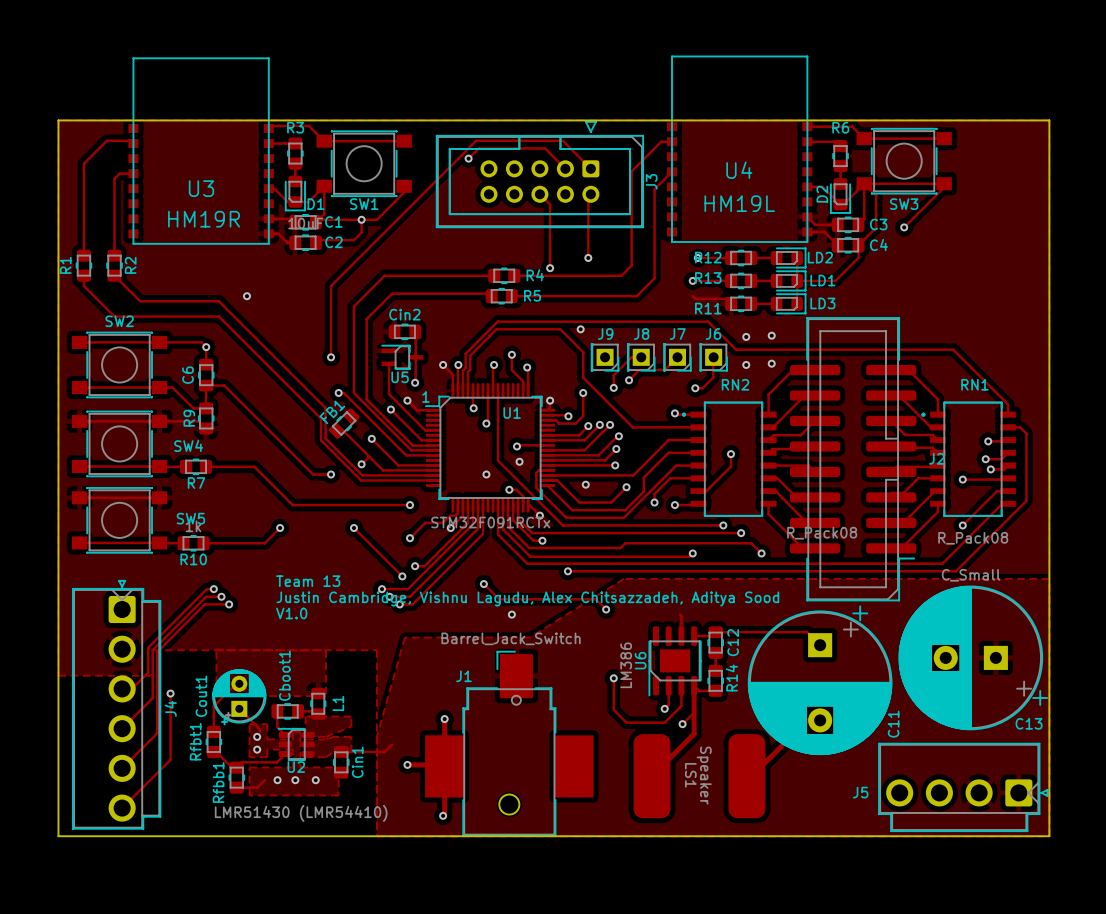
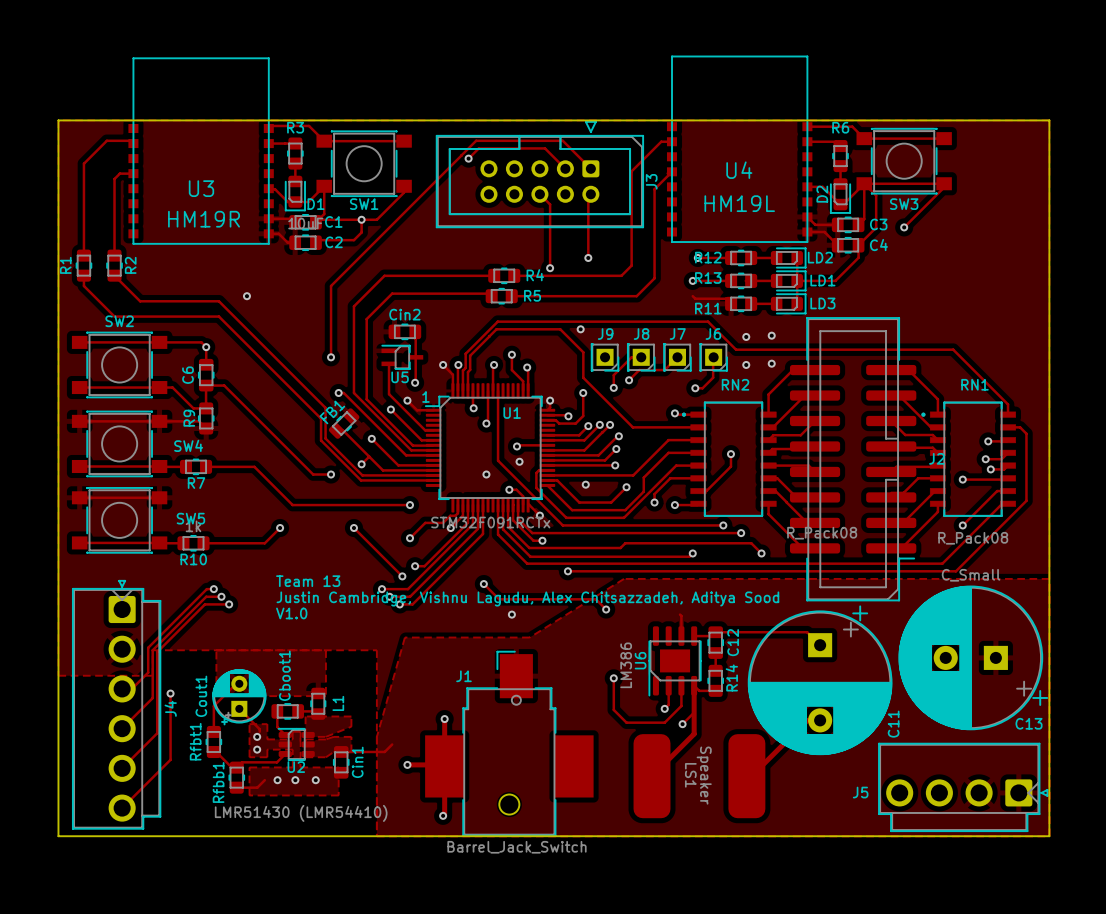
J1 value position: Barrel_Jack_Switch (511, 638) -> Barrel_Jack_Switch (516, 847)

